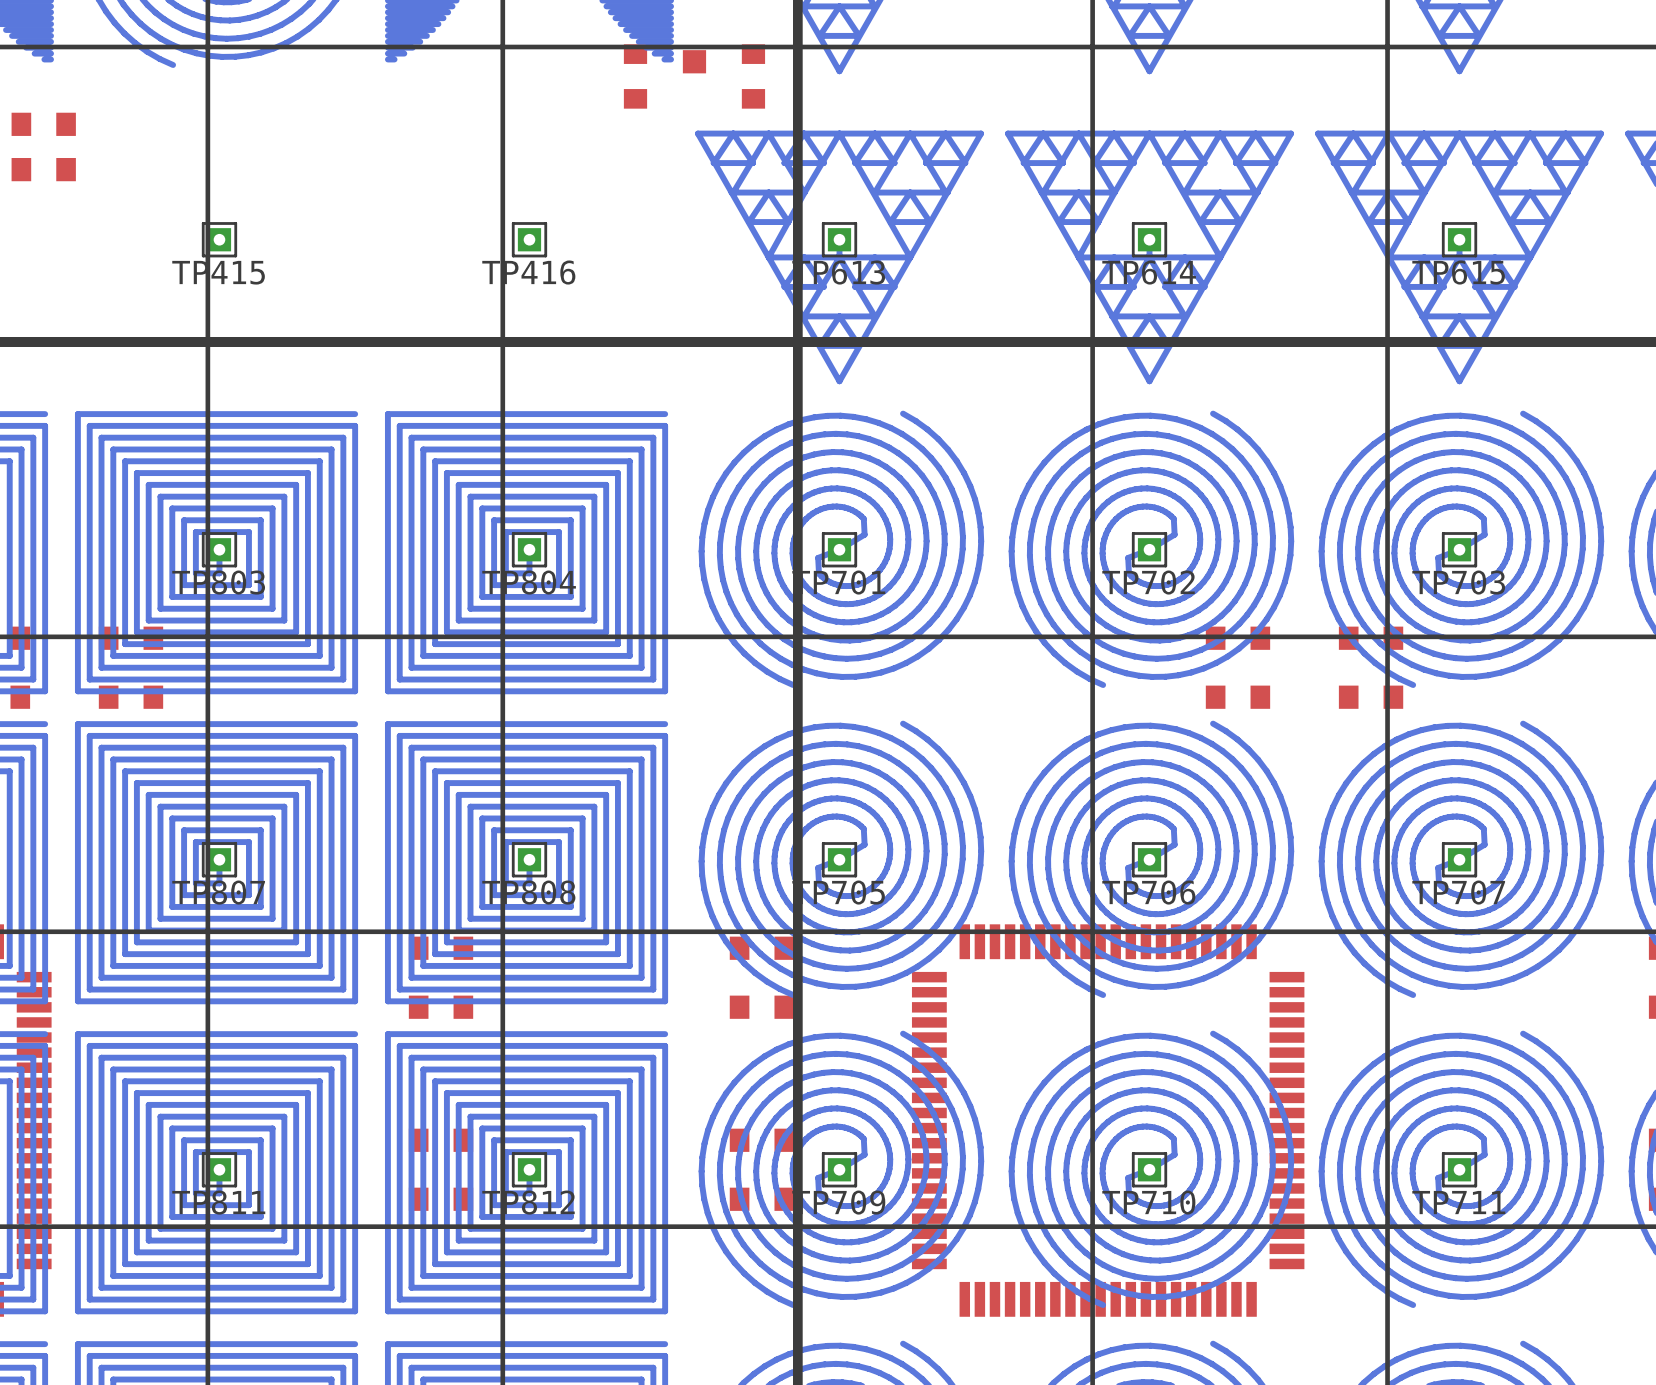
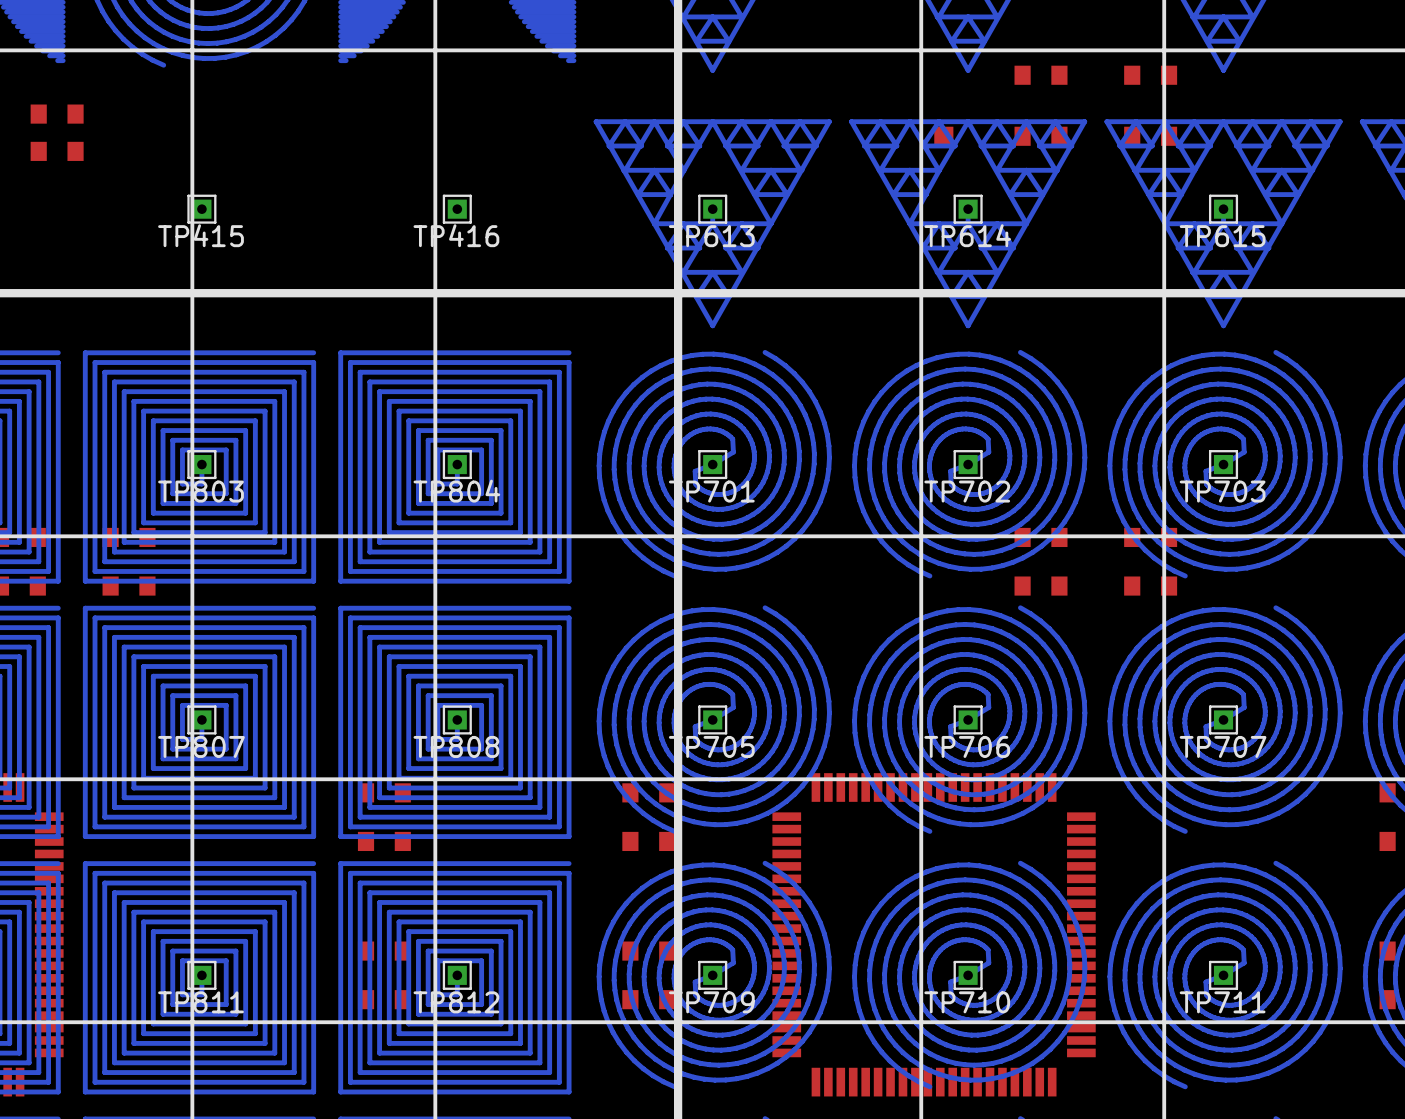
part position: (694, 61) -> (943, 136)
part: (635, 76) -> none
part: (753, 76) -> none
part: none -> (1041, 75)
part: none -> (1150, 75)
part: none -> (1041, 136)
part: none -> (1150, 136)

